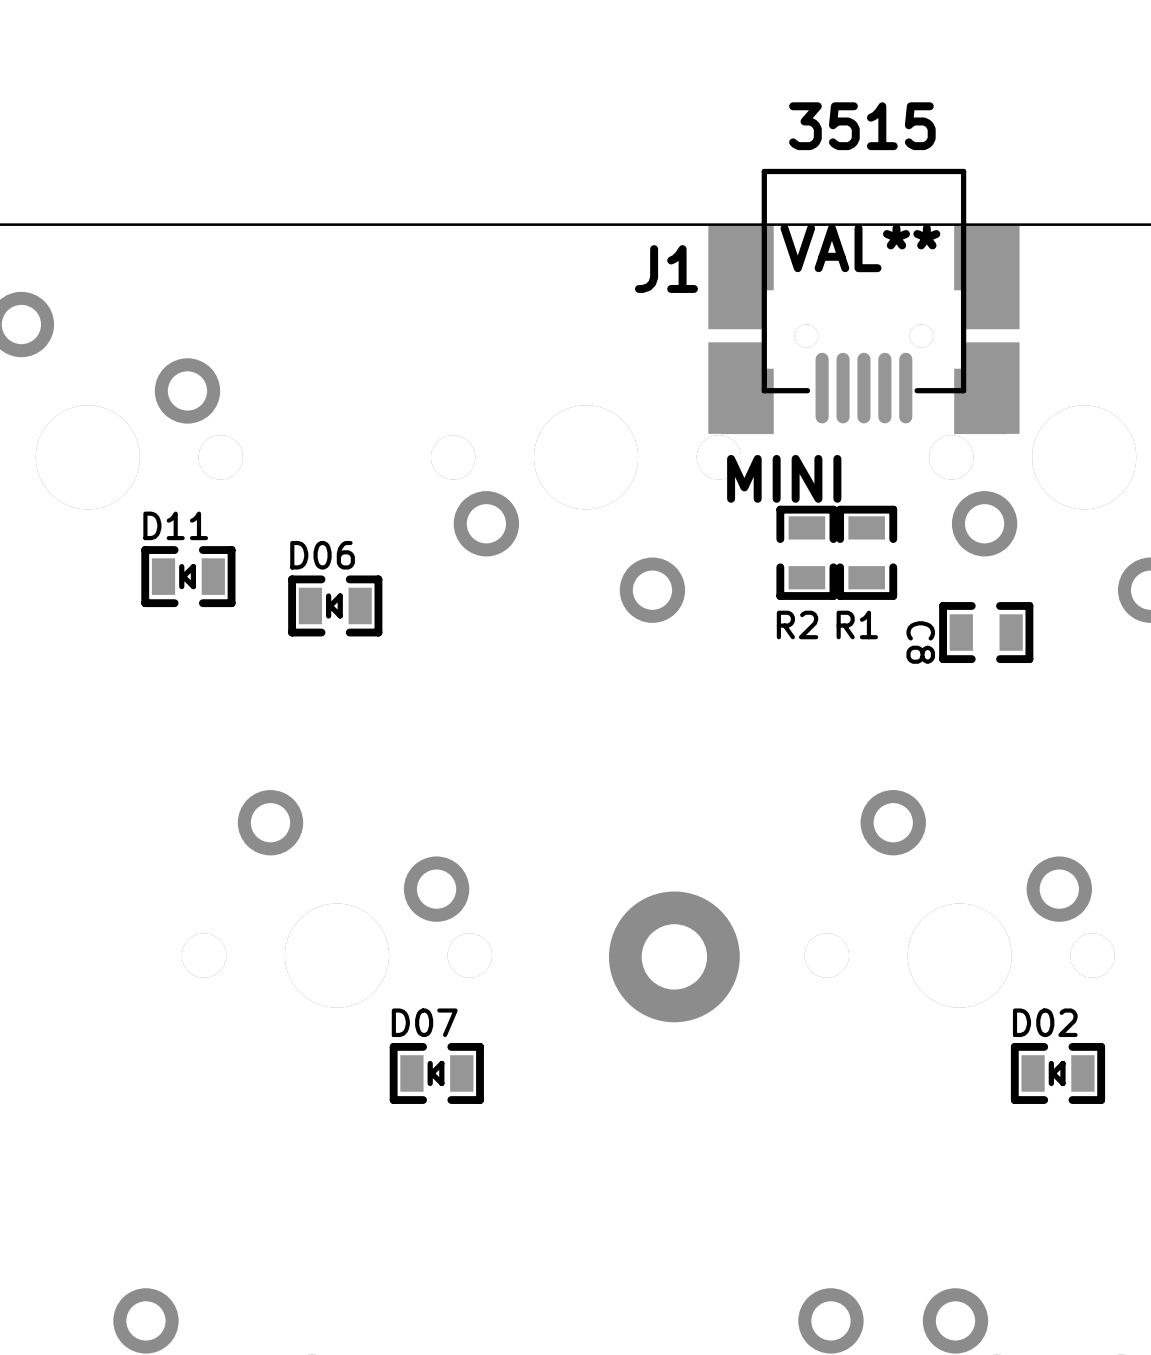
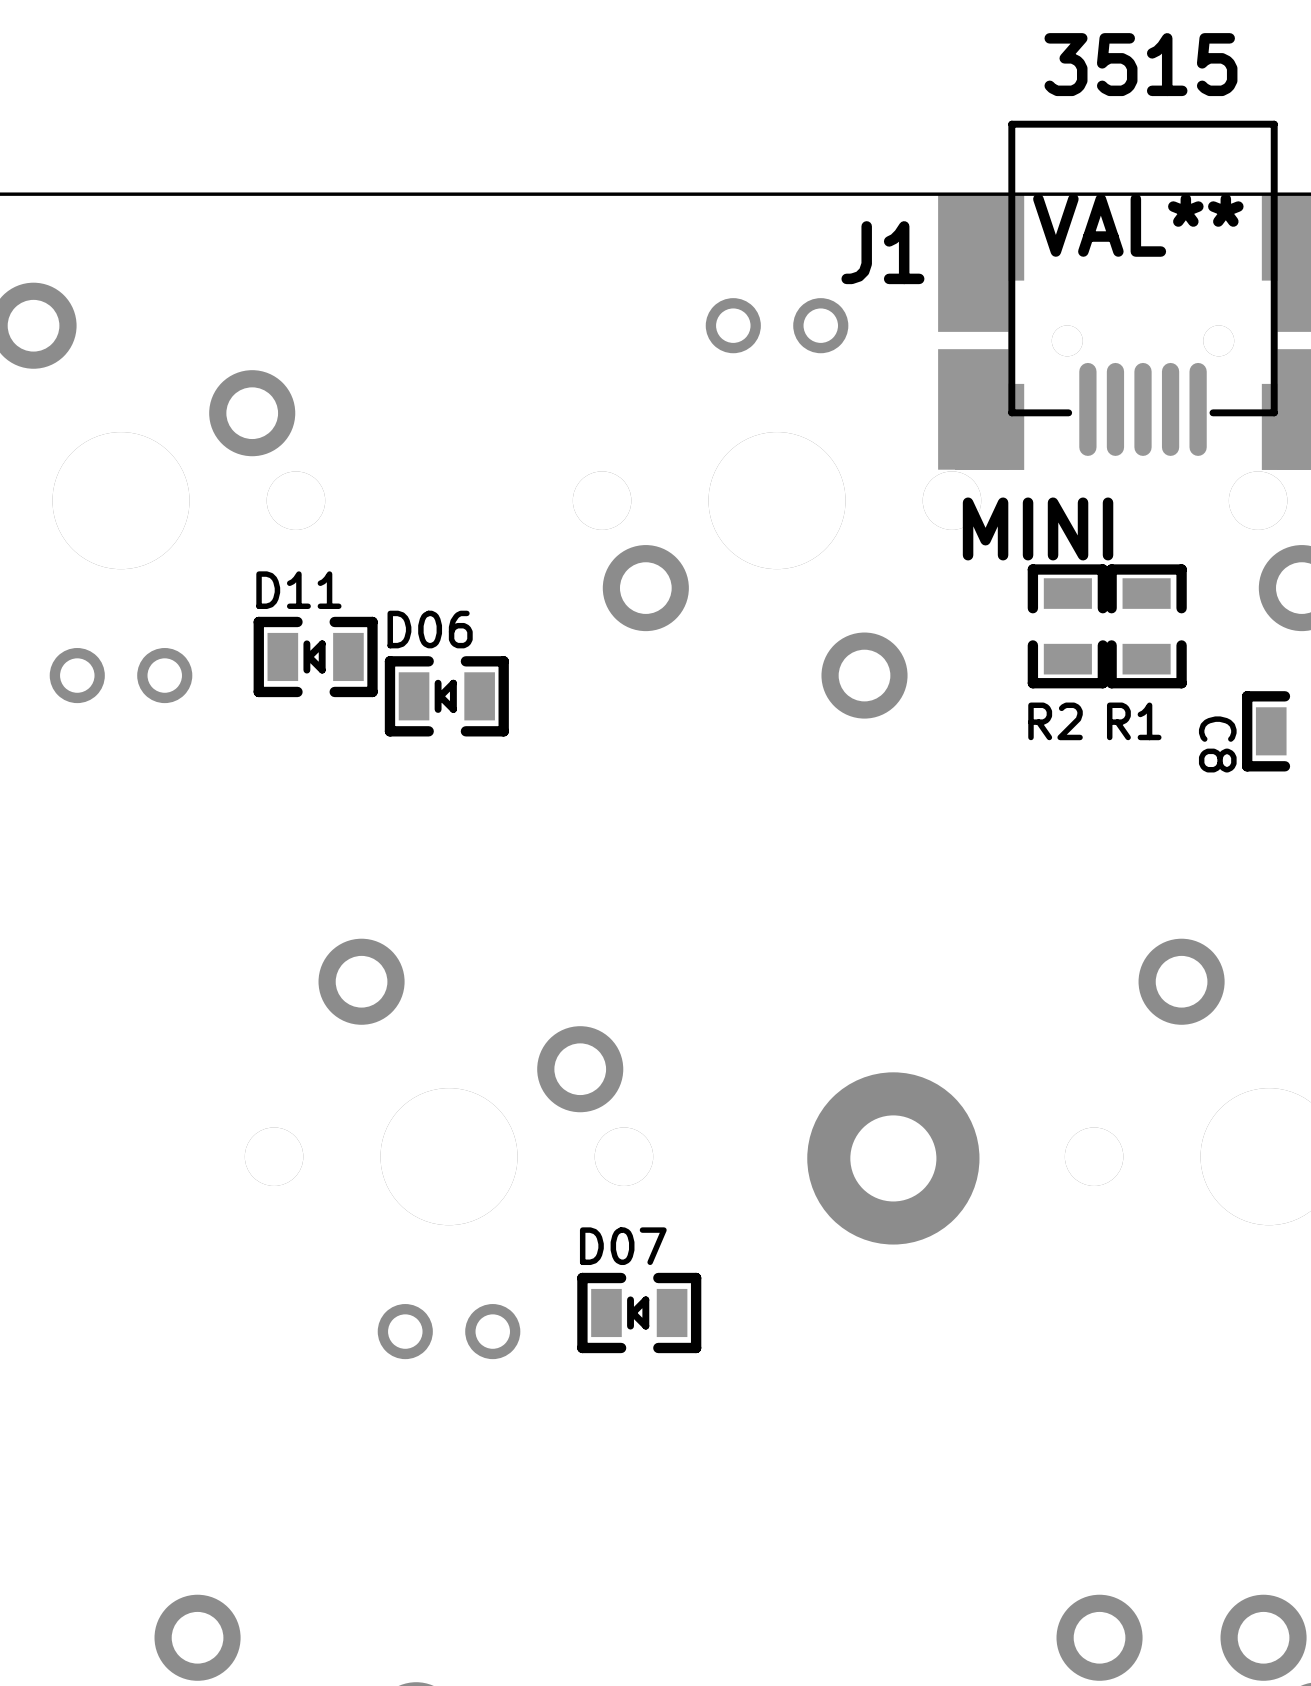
part: none -> (777, 325)
D11 position: (188, 576) -> (315, 656)
part: none -> (121, 675)
D07 position: (436, 1073) -> (639, 1312)
part: none -> (449, 1331)

